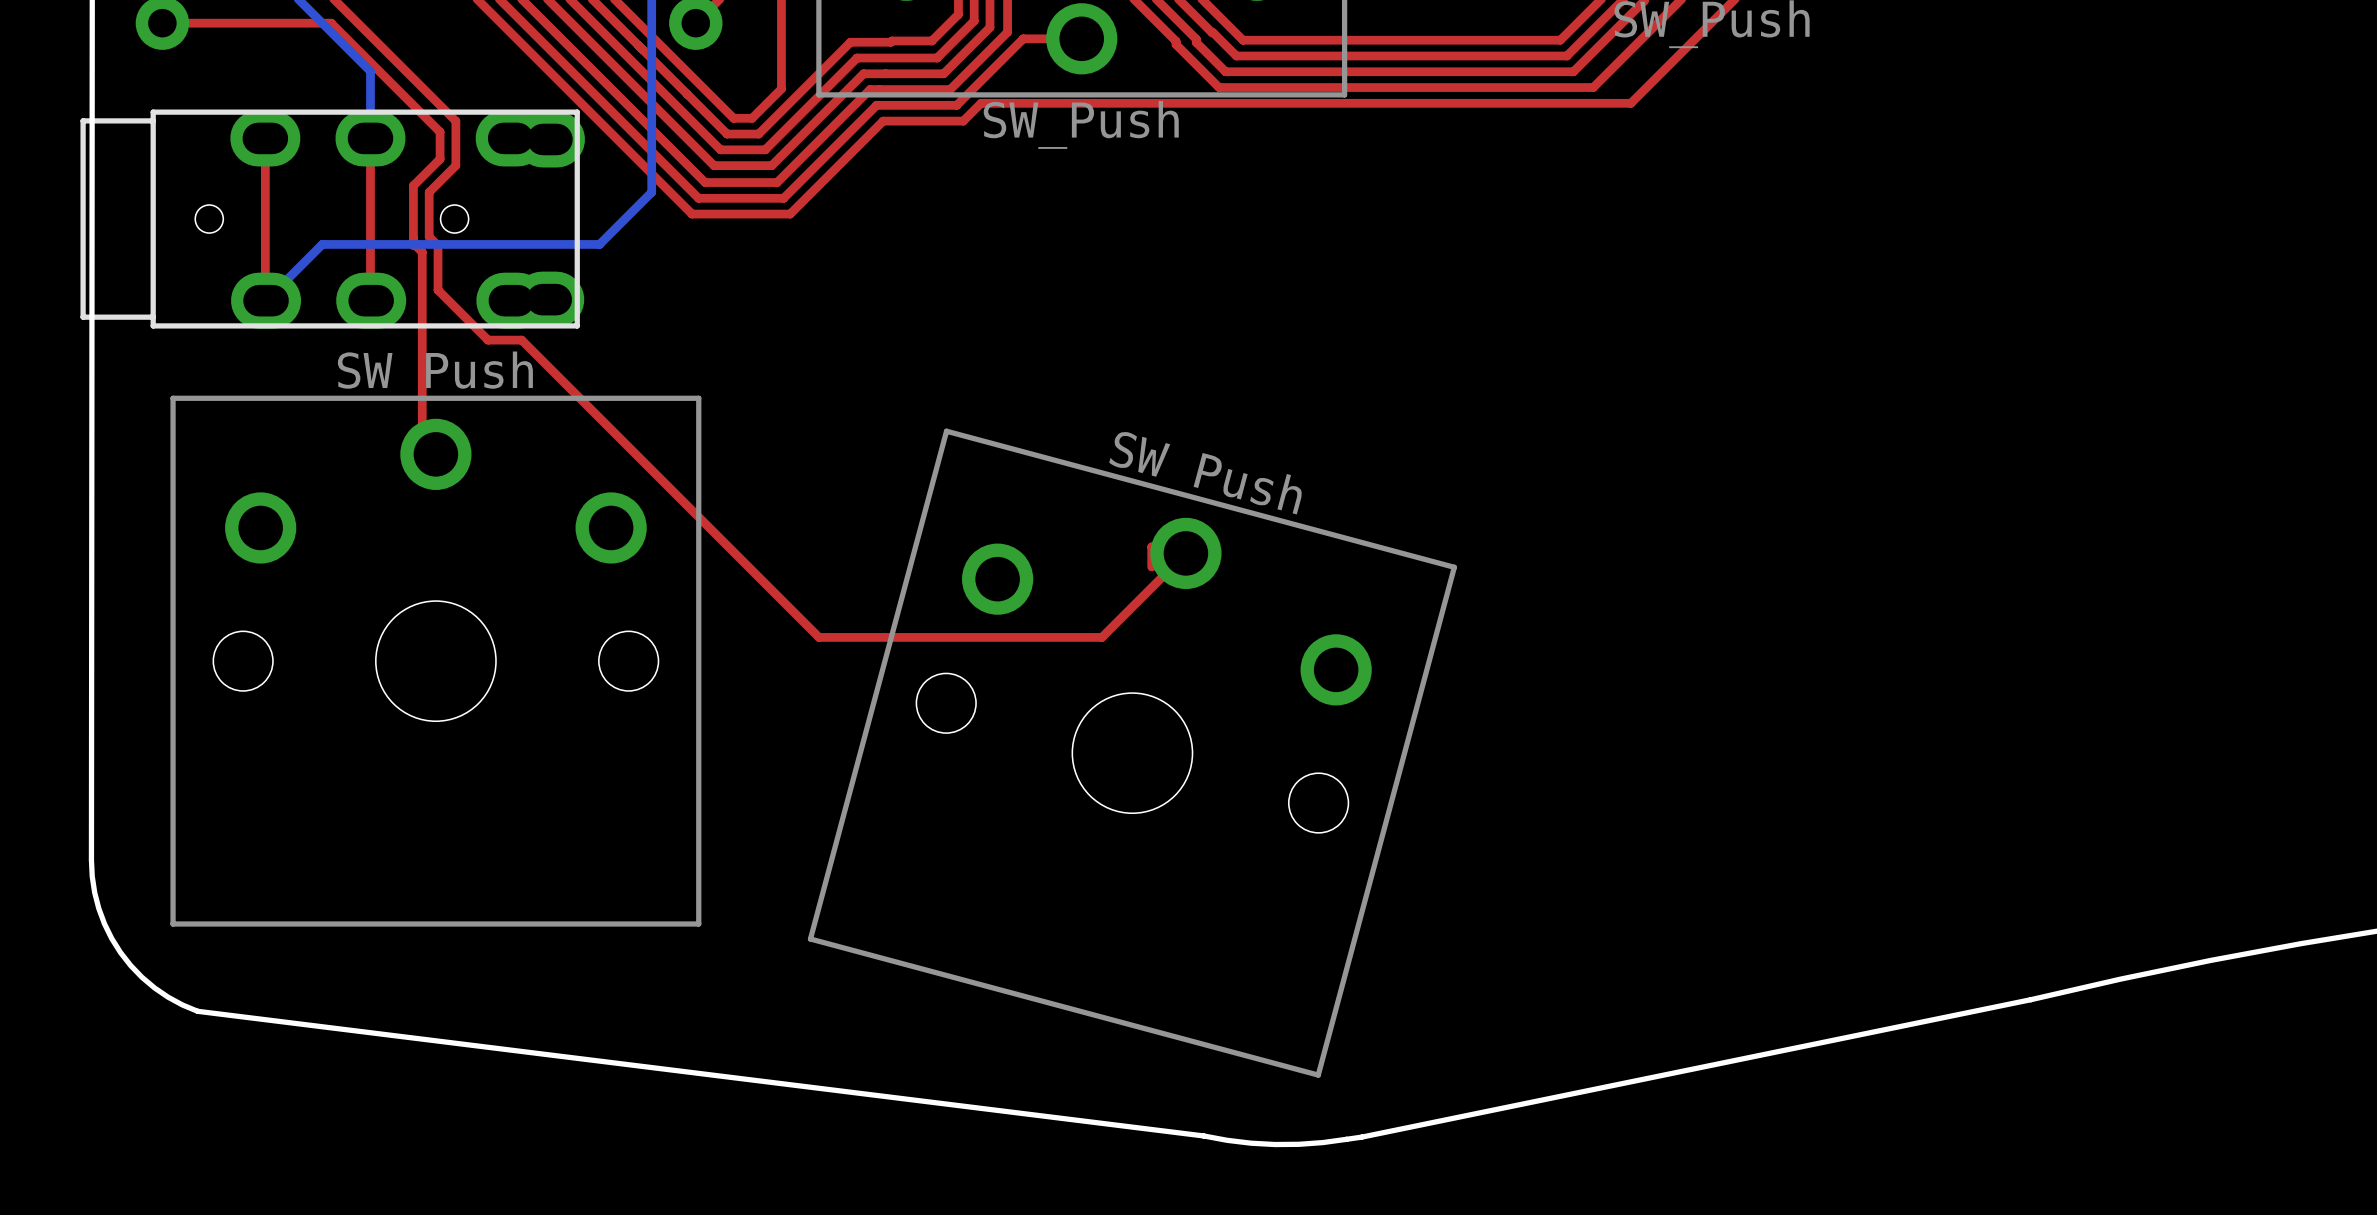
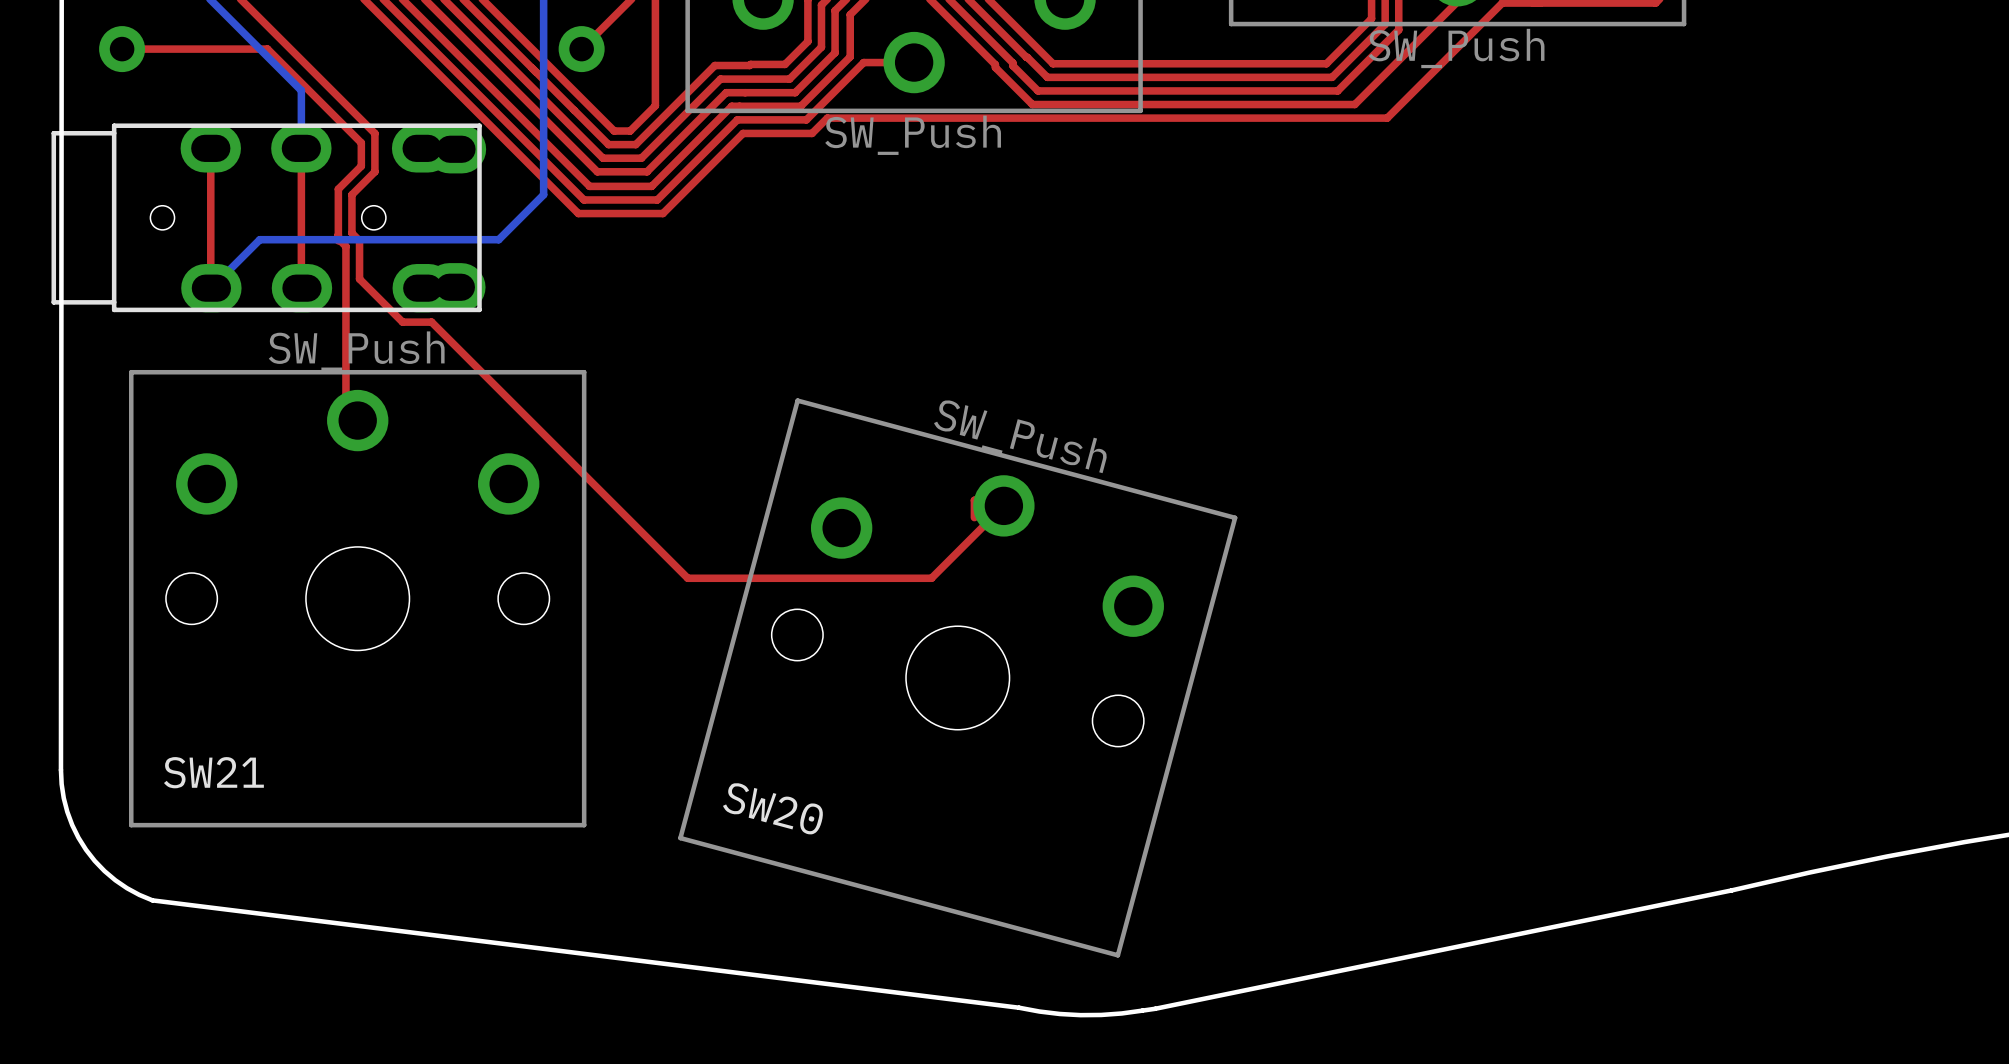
SW21 name: none -> SW21 (213, 772)
SW20 name: none -> SW20 (773, 808)

